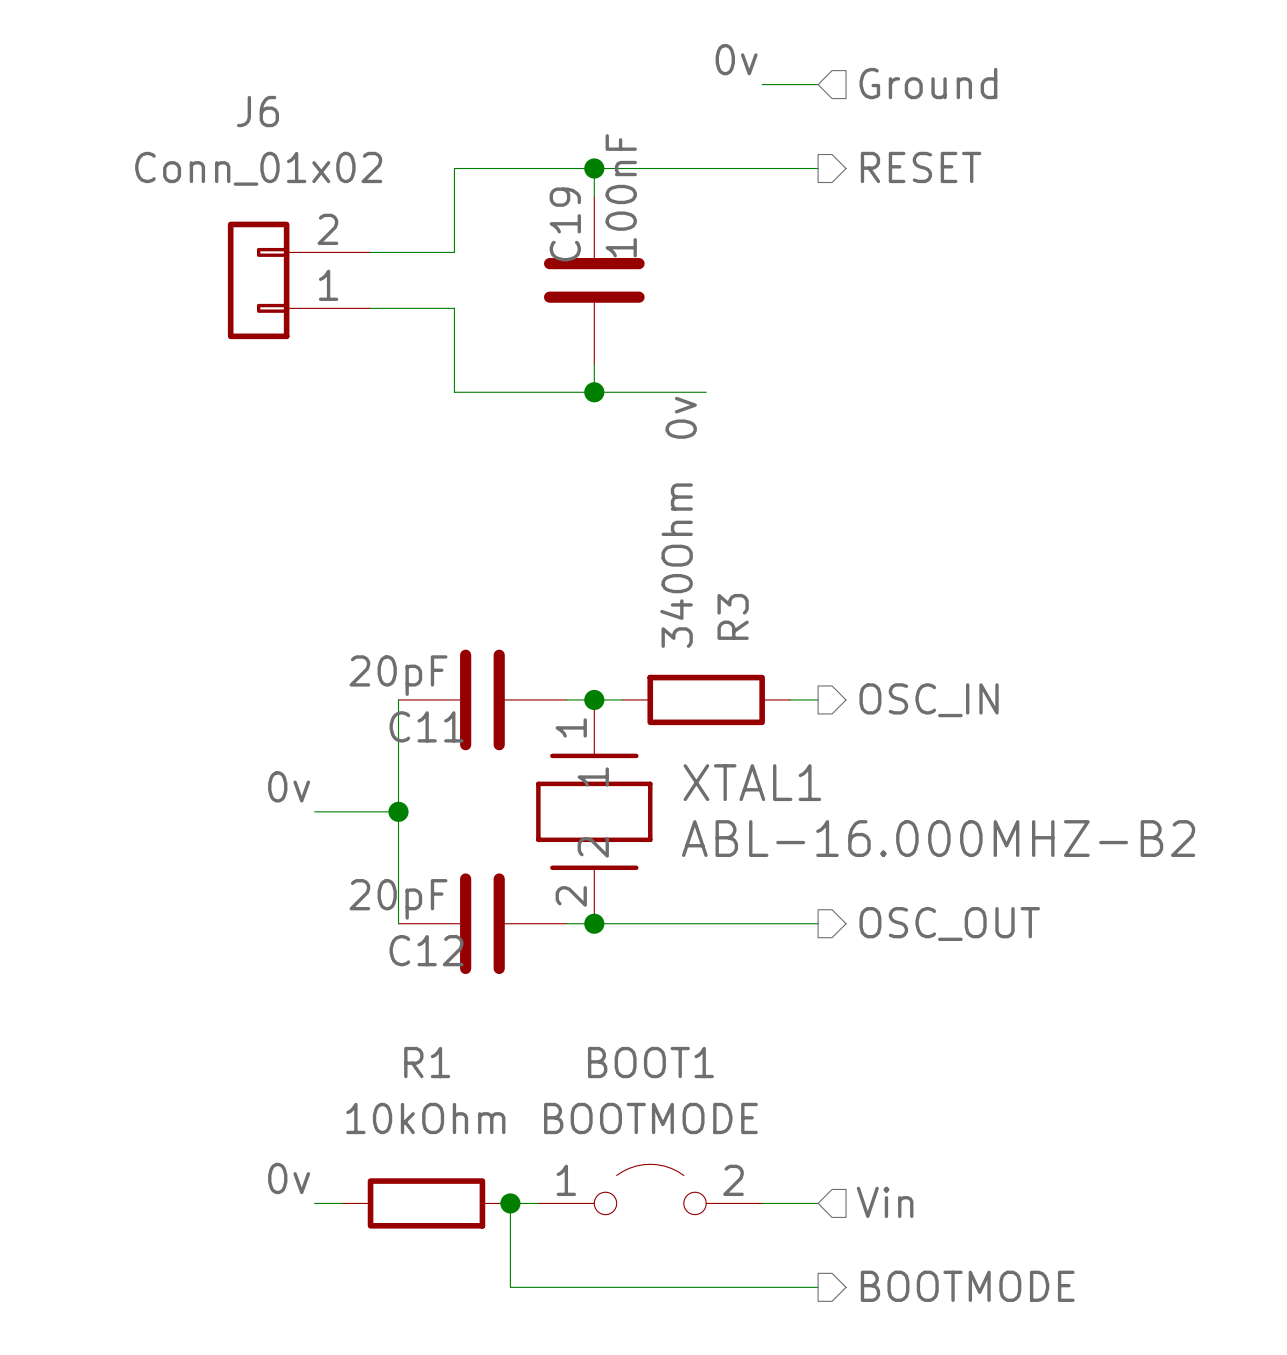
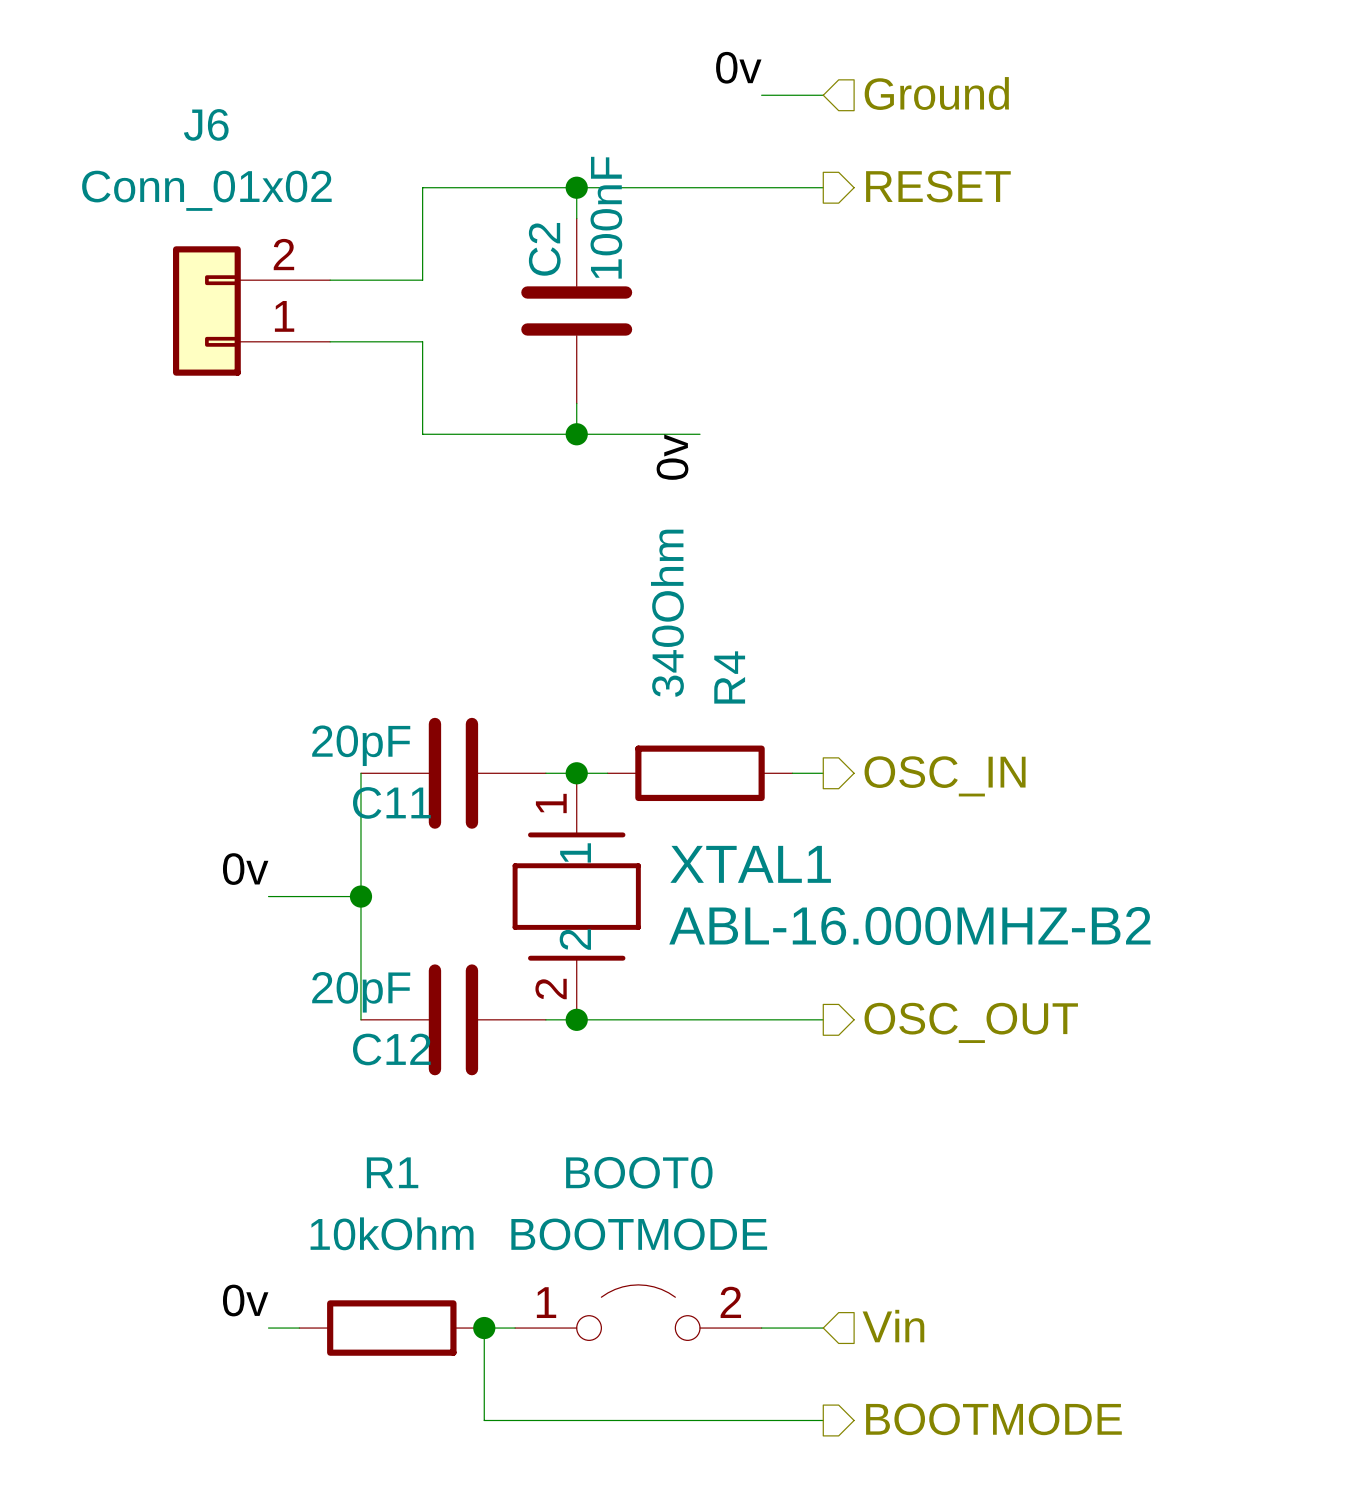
C19 name: C19 (565, 224) -> C2 (544, 249)
R3 name: R3 (733, 616) -> R4 (729, 677)
BOOT1 name: BOOT1 (650, 1062) -> BOOT0 (639, 1172)

